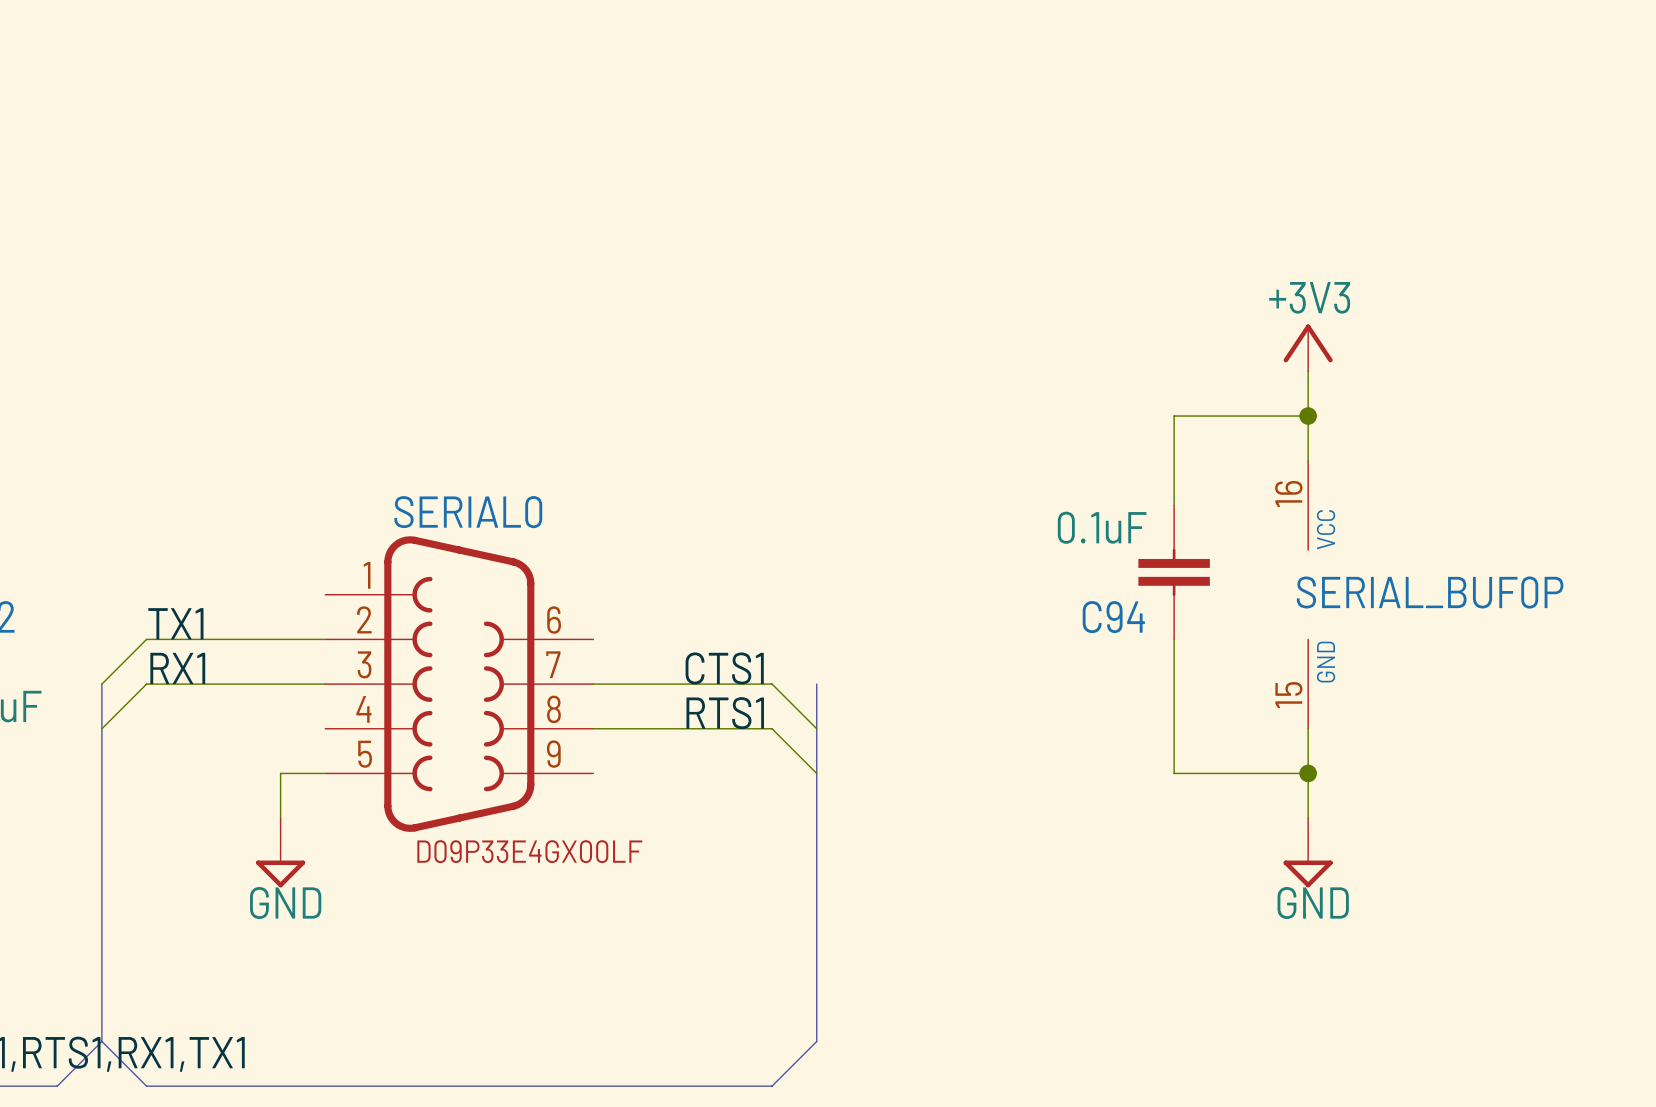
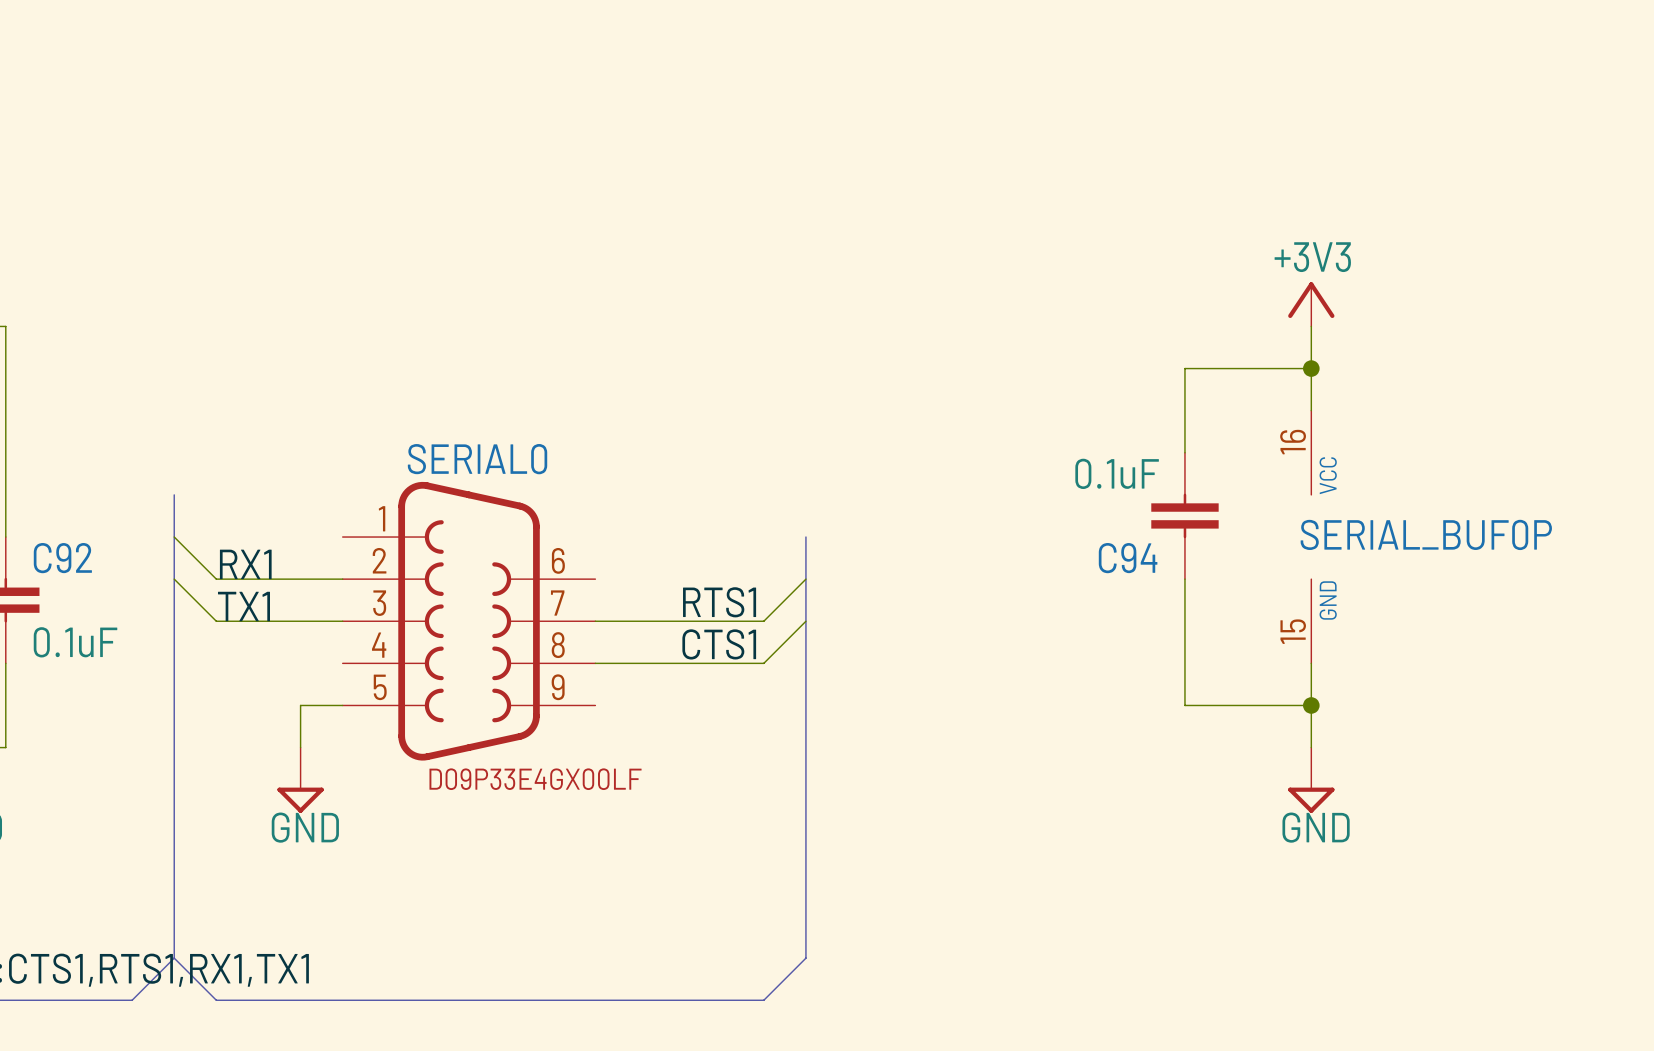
bus: none -> (174, 494) (174, 621)
label: TX1 (175, 623) -> RX1 (245, 564)
wire: (146, 639) (101, 684) -> (216, 579) (174, 537)
label: RX1 (177, 668) -> TX1 (243, 606)
label position: CTS1 (724, 668) -> CTS1 (719, 644)
wire: (146, 684) (101, 728) -> (216, 621) (174, 579)
SERIAL0 position: (459, 684) -> (469, 621)
wire: (727, 684) (772, 684) (816, 728) -> (763, 621) (805, 579)
bus: (816, 684) (816, 1041) (772, 1086) (727, 1086) -> (805, 537) (805, 958) (763, 1000)
label position: RTS1 (725, 713) -> RTS1 (719, 602)
wire: (727, 728) (772, 728) (816, 773) -> (763, 663) (805, 621)
wire: (325, 773) (280, 773) (280, 818) -> (342, 705) (300, 705) (300, 747)
text position: D09P33E4GX00LF (529, 851) -> D09P33E4GX00LF (535, 779)
power symbol position: GND (280, 852) -> GND (300, 780)

